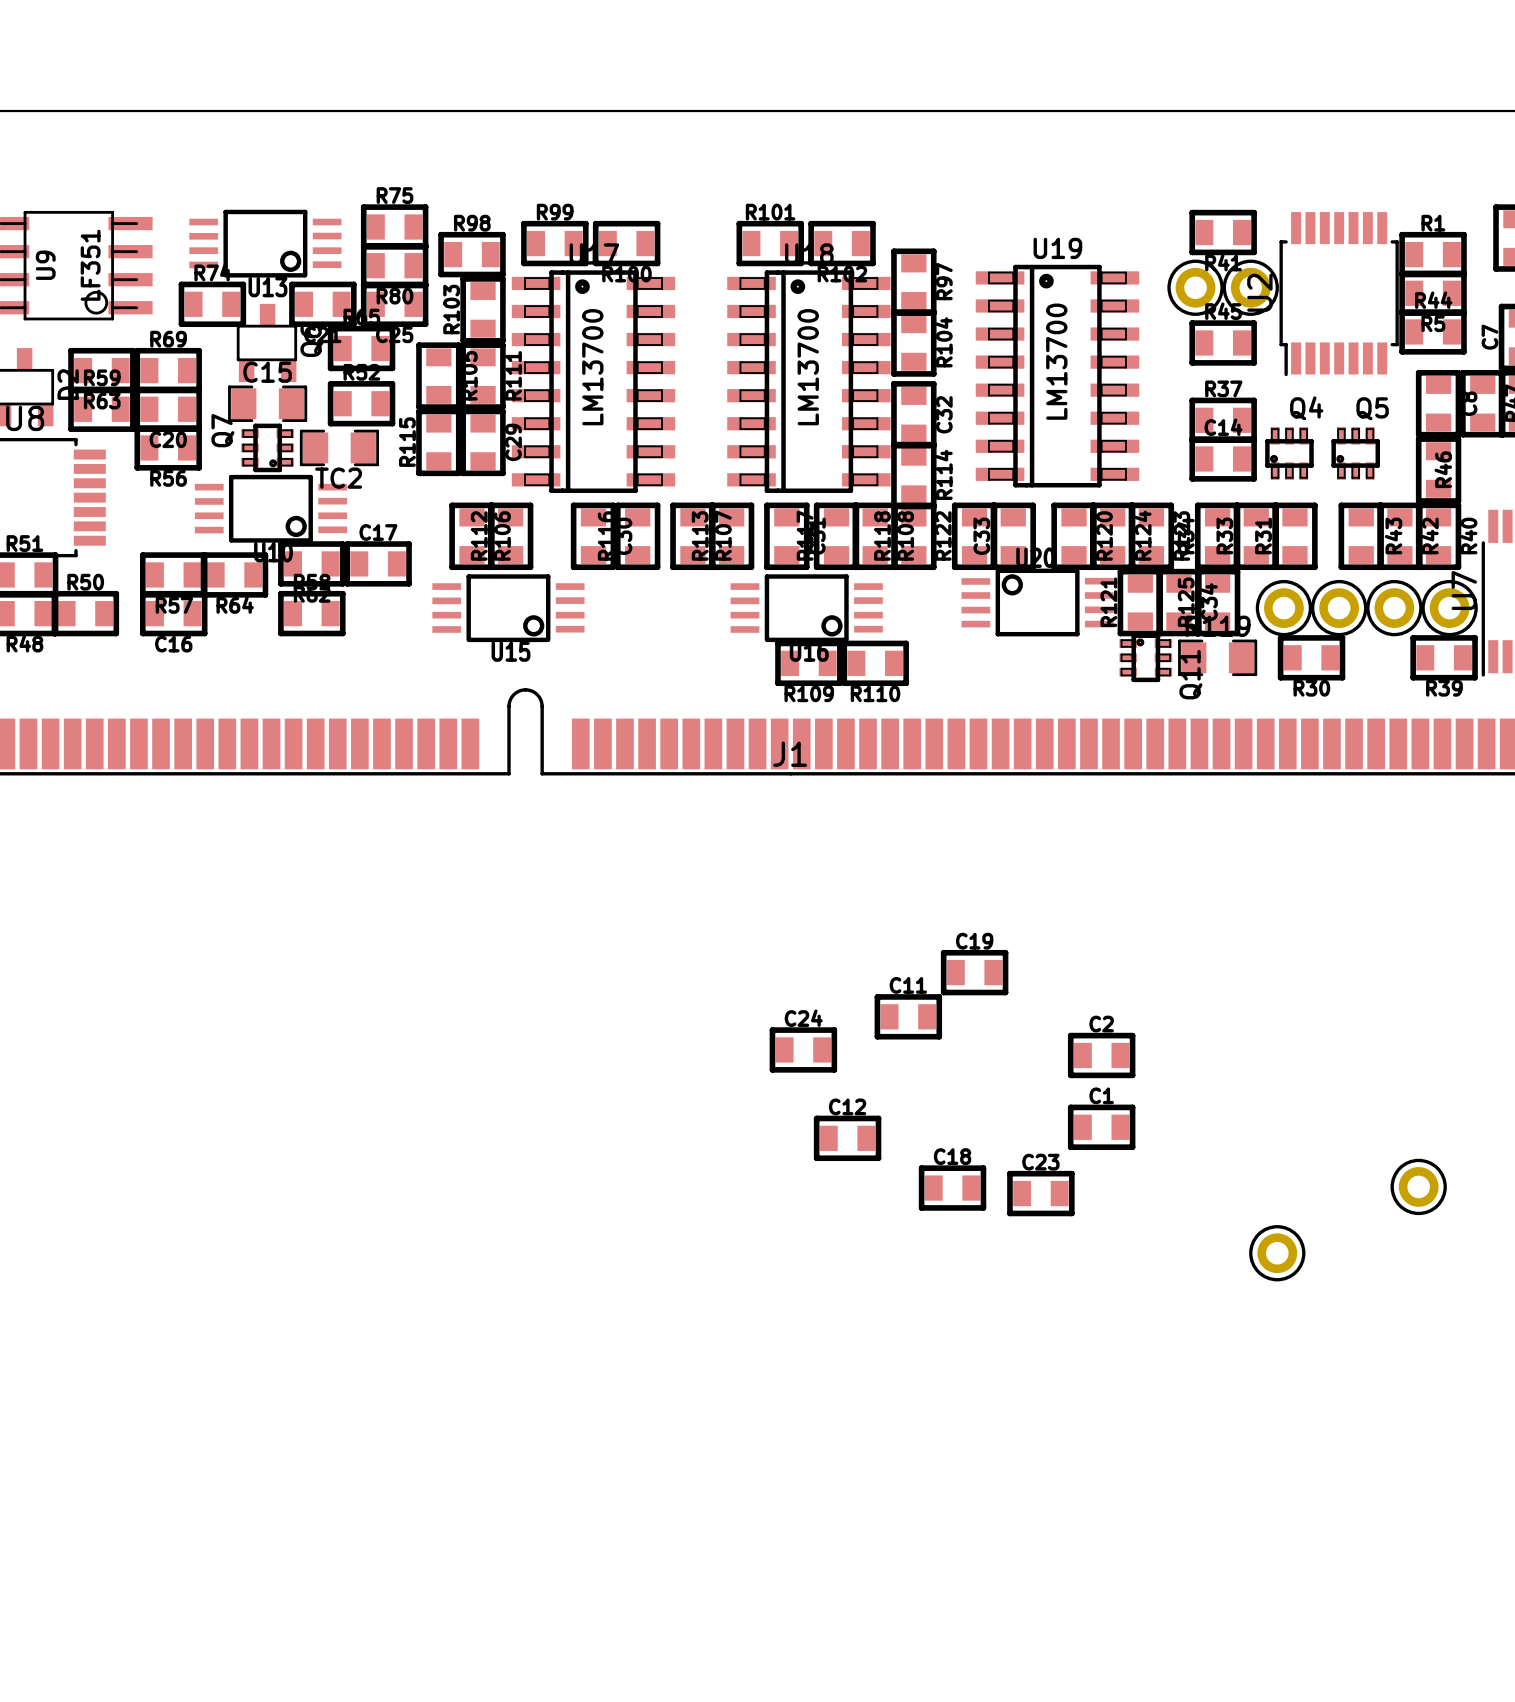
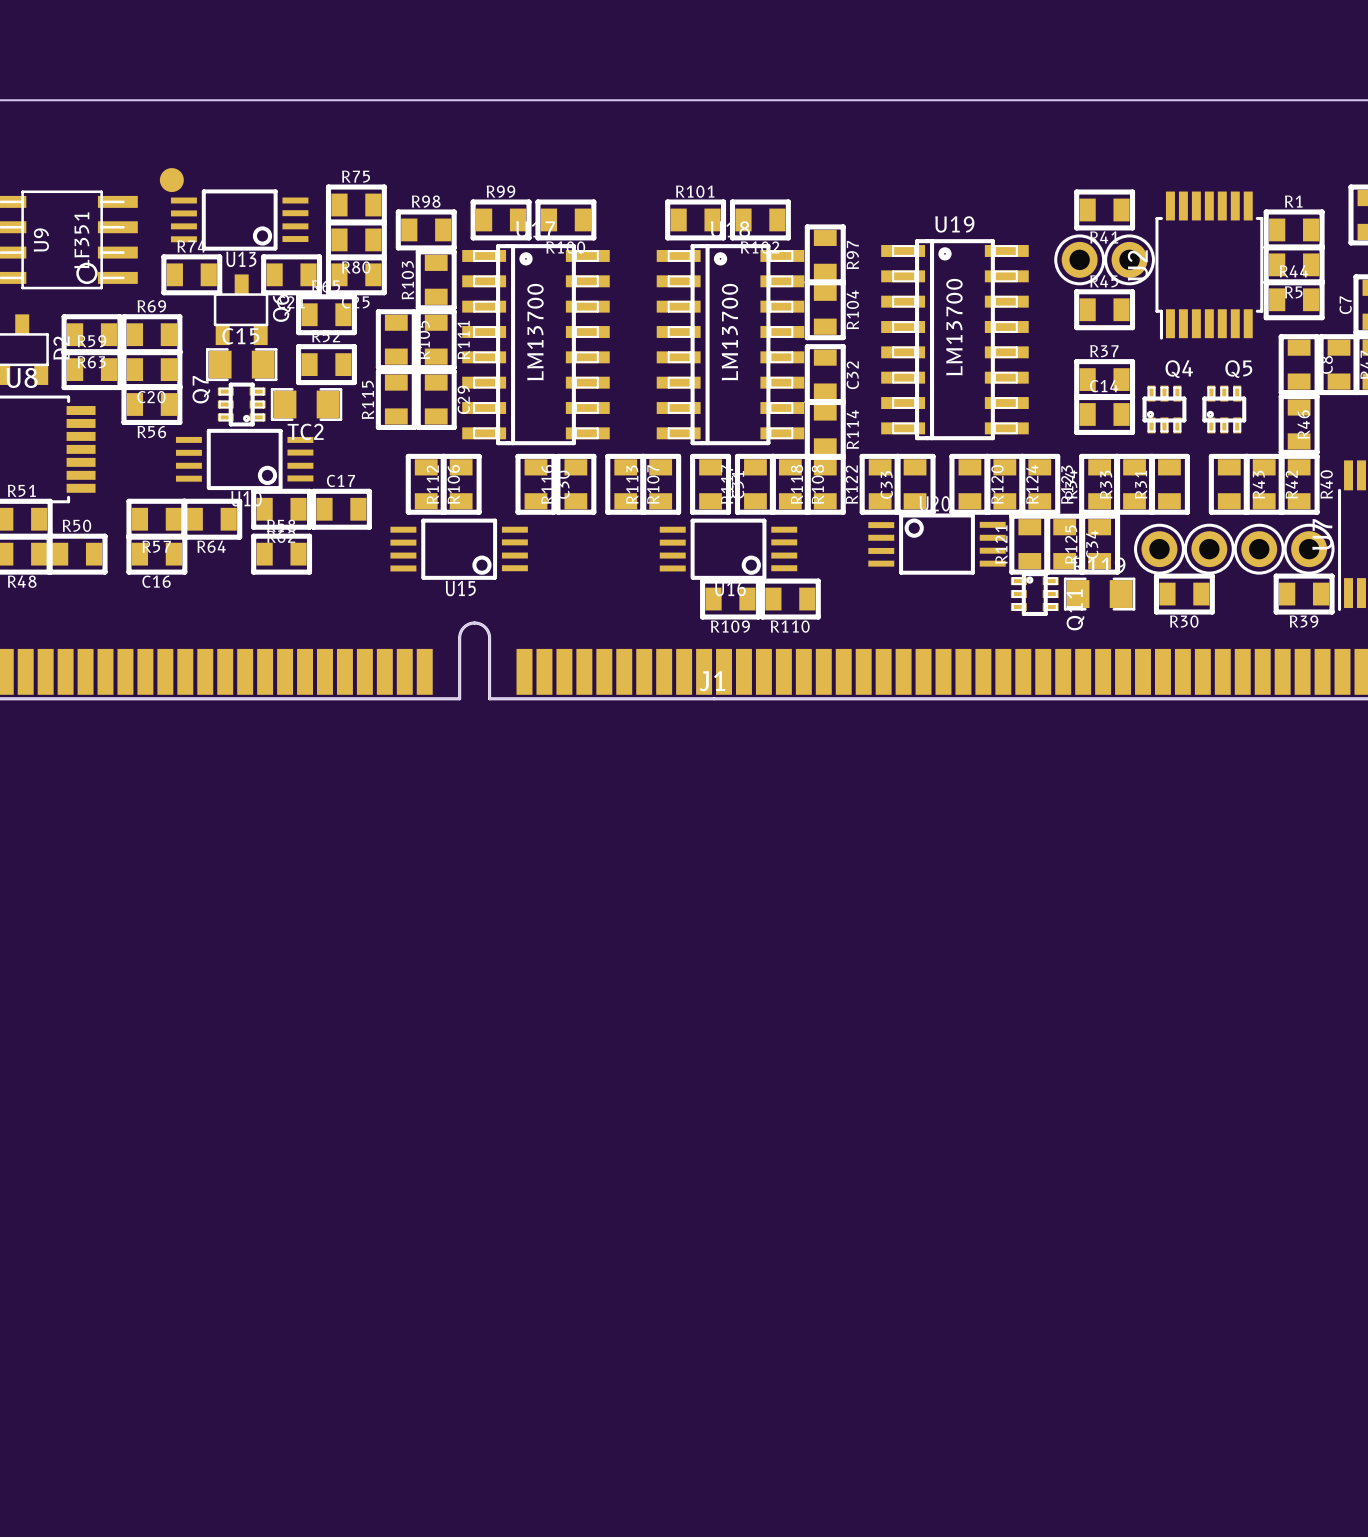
part: none -> (171, 180)
C19: (974, 972) -> none
C11: (908, 1016) -> none
C24: (803, 1049) -> none
C2: (1101, 1055) -> none
C1: (1101, 1127) -> none
C12: (847, 1138) -> none
part: (1418, 1186) -> none
C18: (952, 1188) -> none
C23: (1040, 1193) -> none
part: (1277, 1253) -> none

